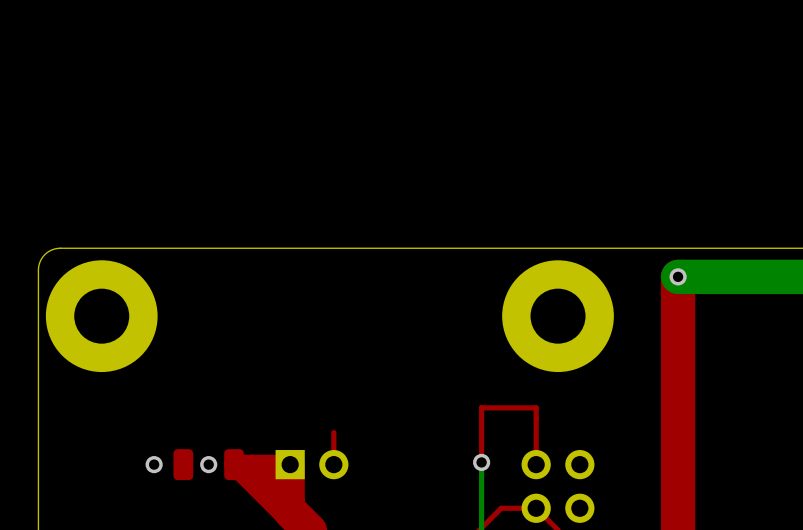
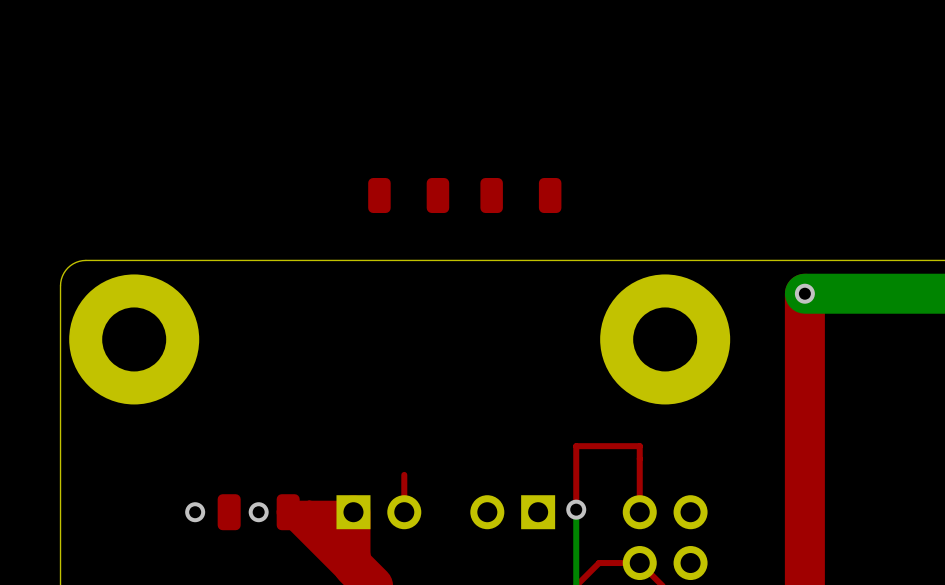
part: none -> (408, 195)
part: none -> (520, 195)
part: none -> (512, 512)

